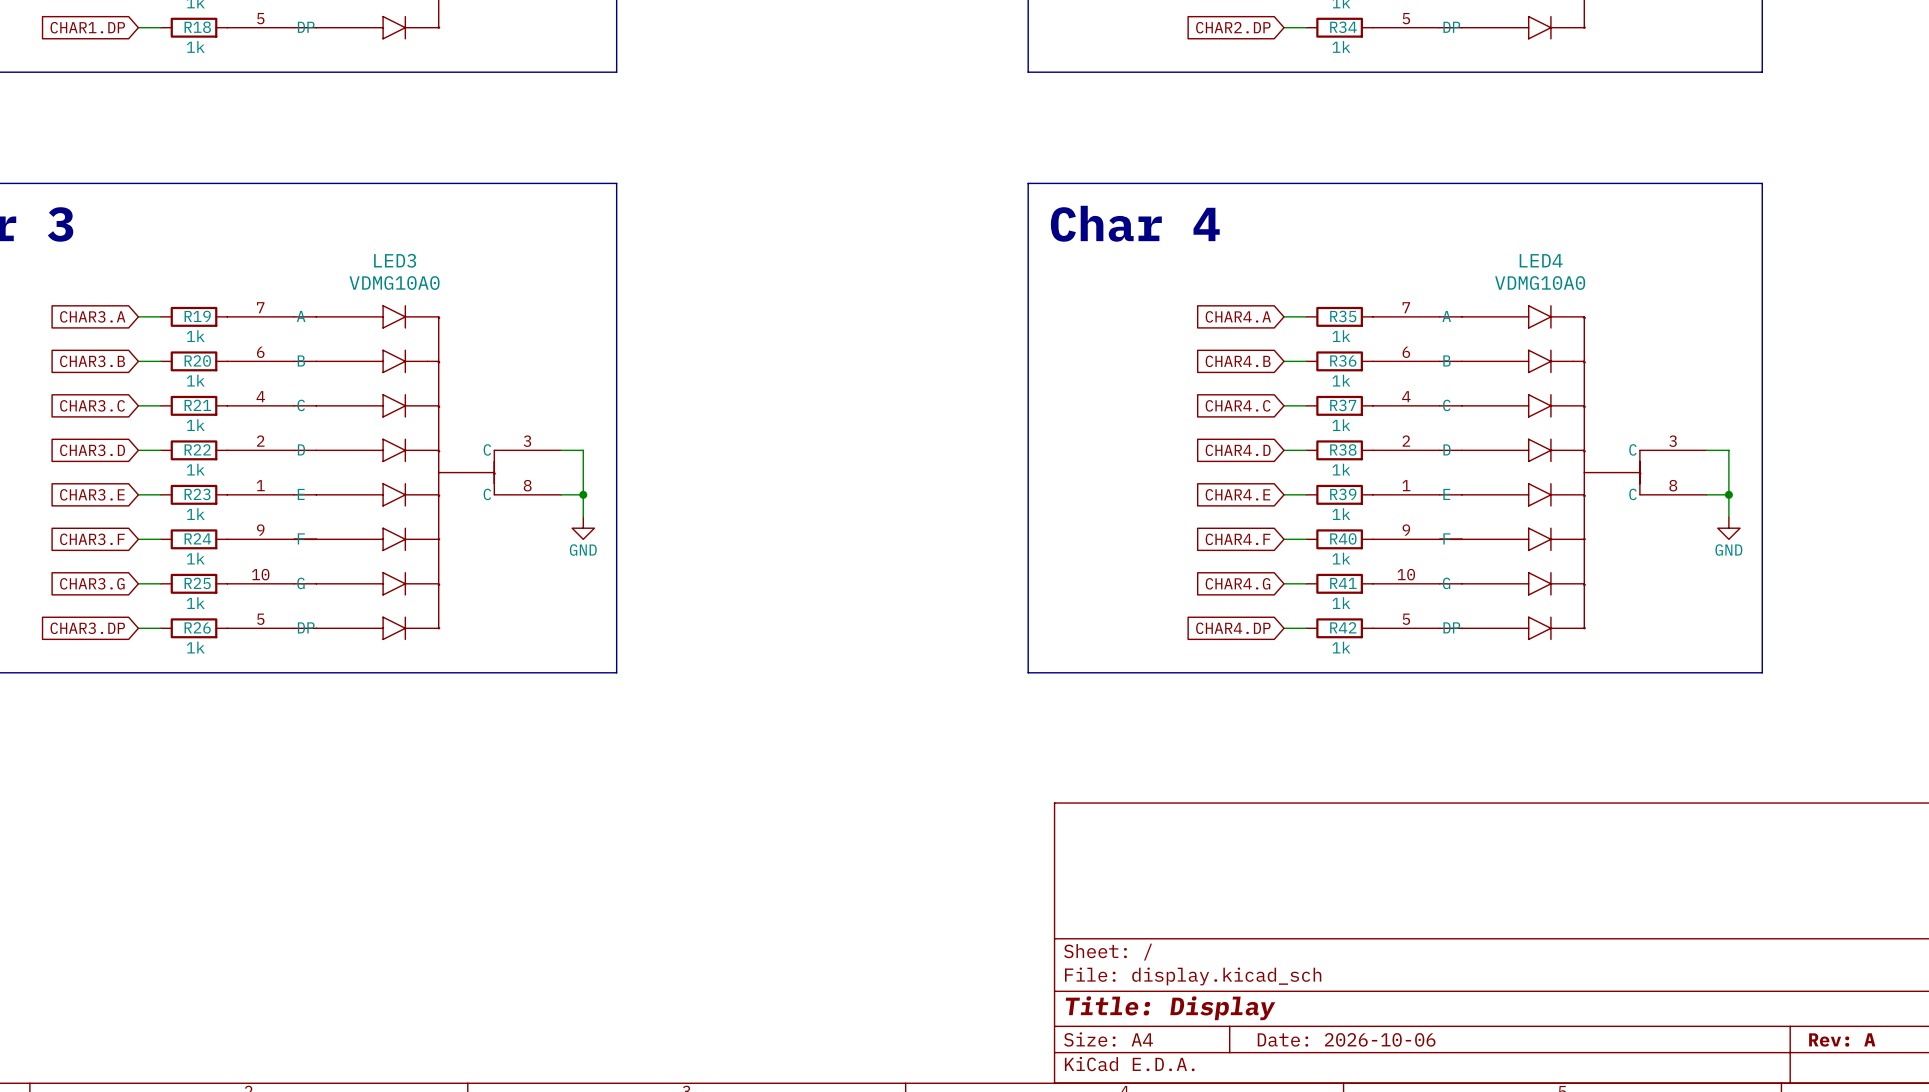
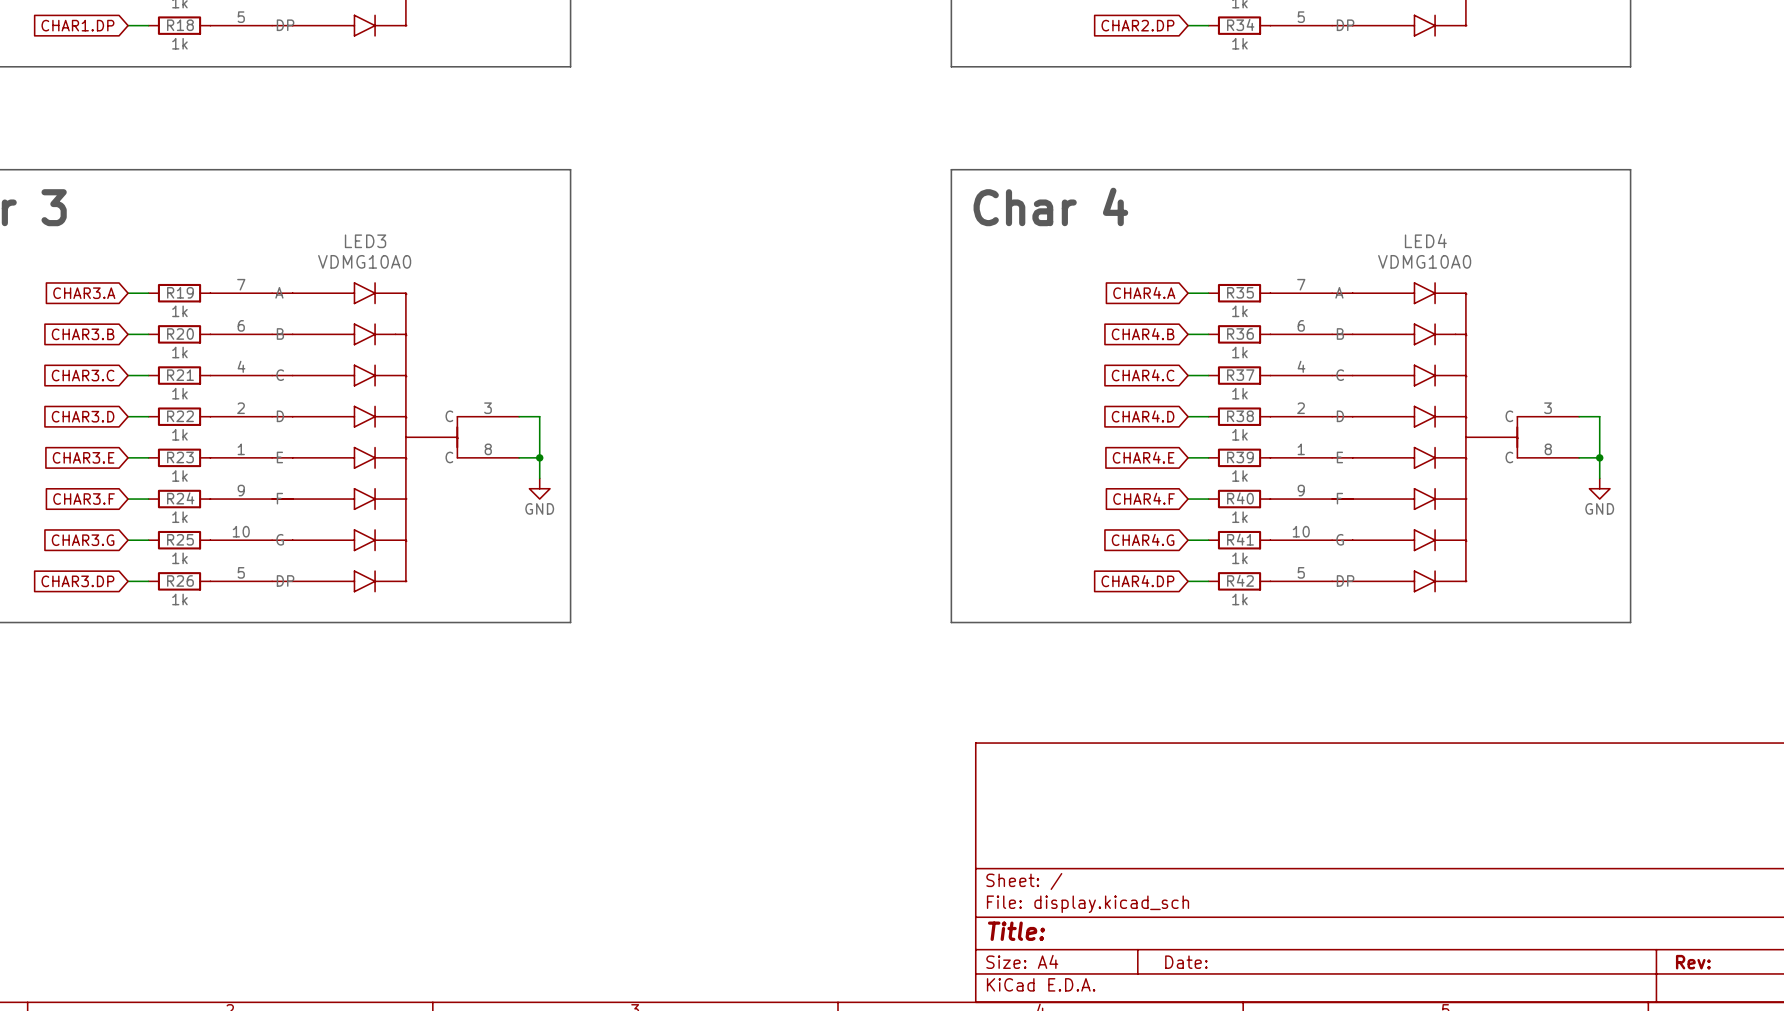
title block: Title: Display (1170, 1008) -> Title: (1016, 931)
title block: Date: 2026-10-06 (1346, 1039) -> Date: (1186, 962)
title block: Rev: A (1842, 1039) -> Rev: (1693, 962)

